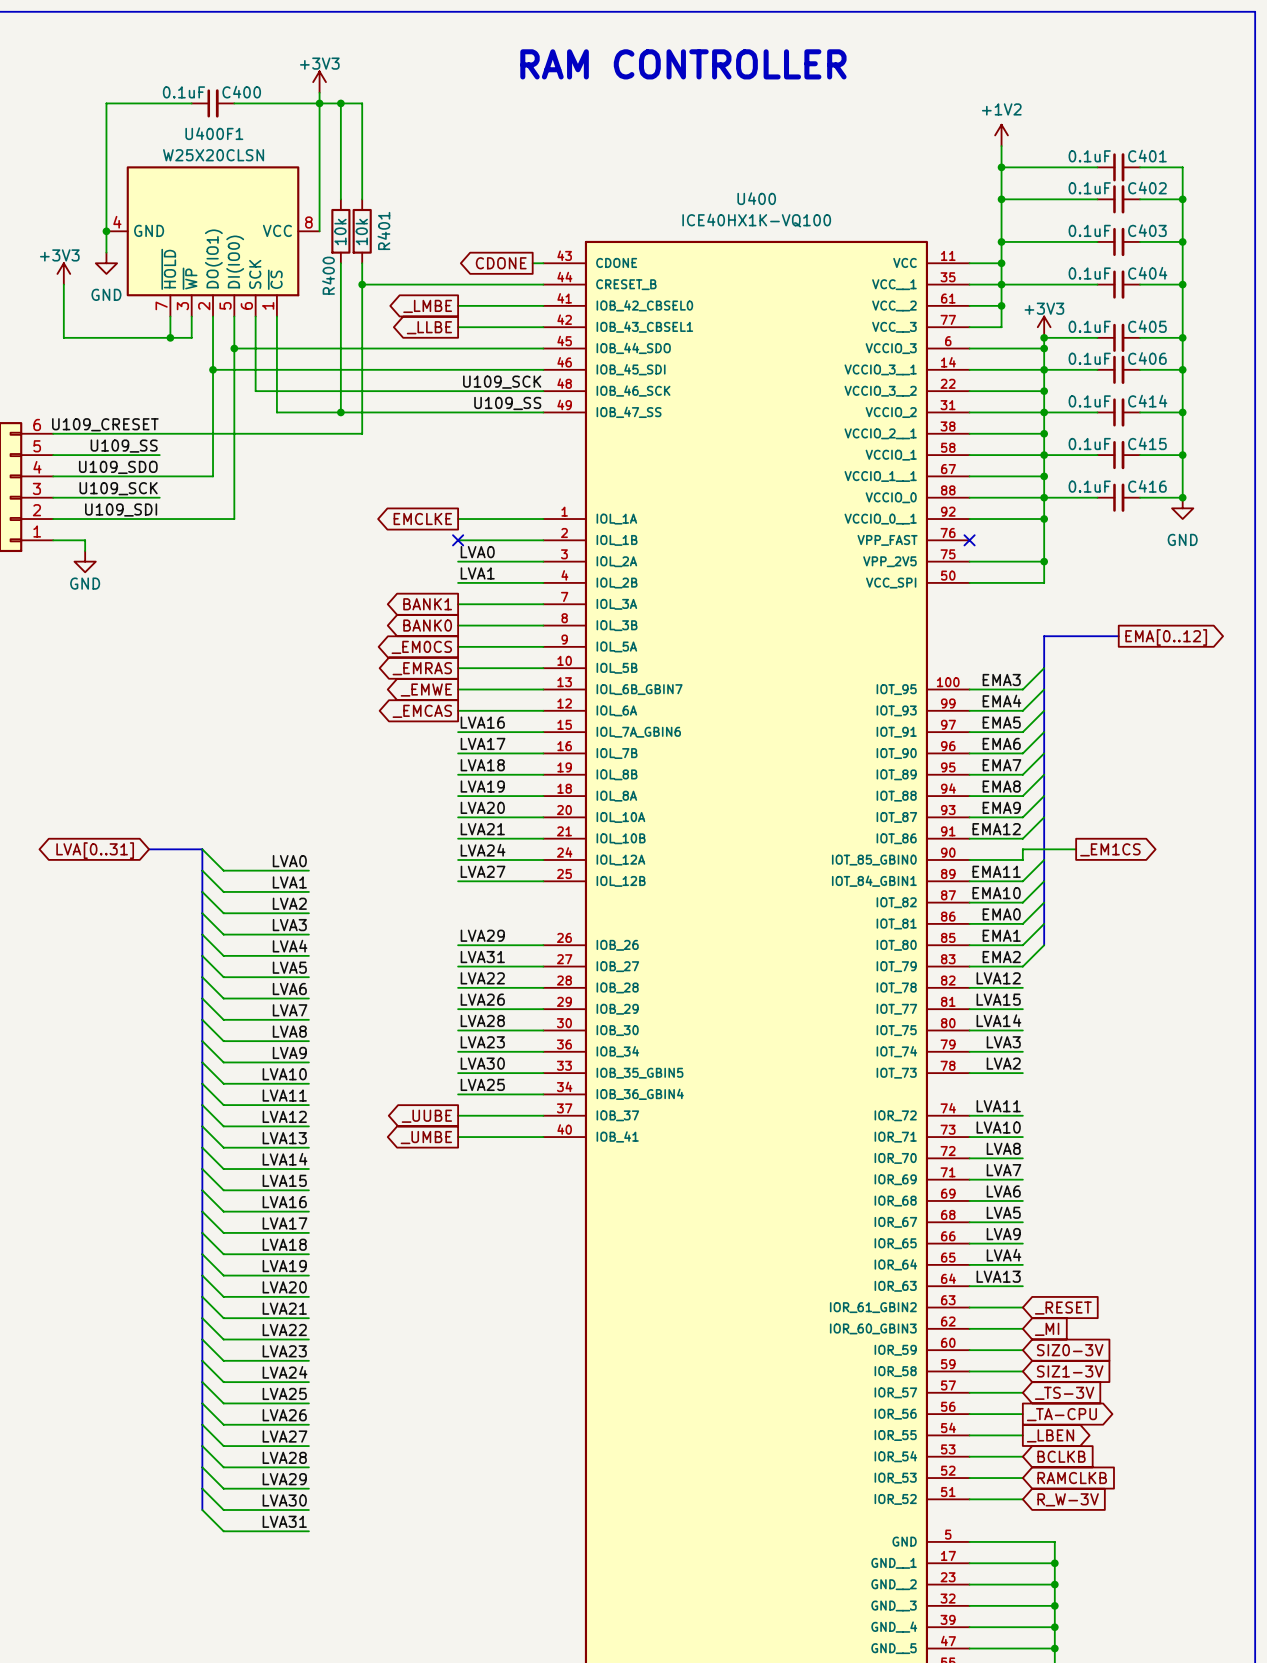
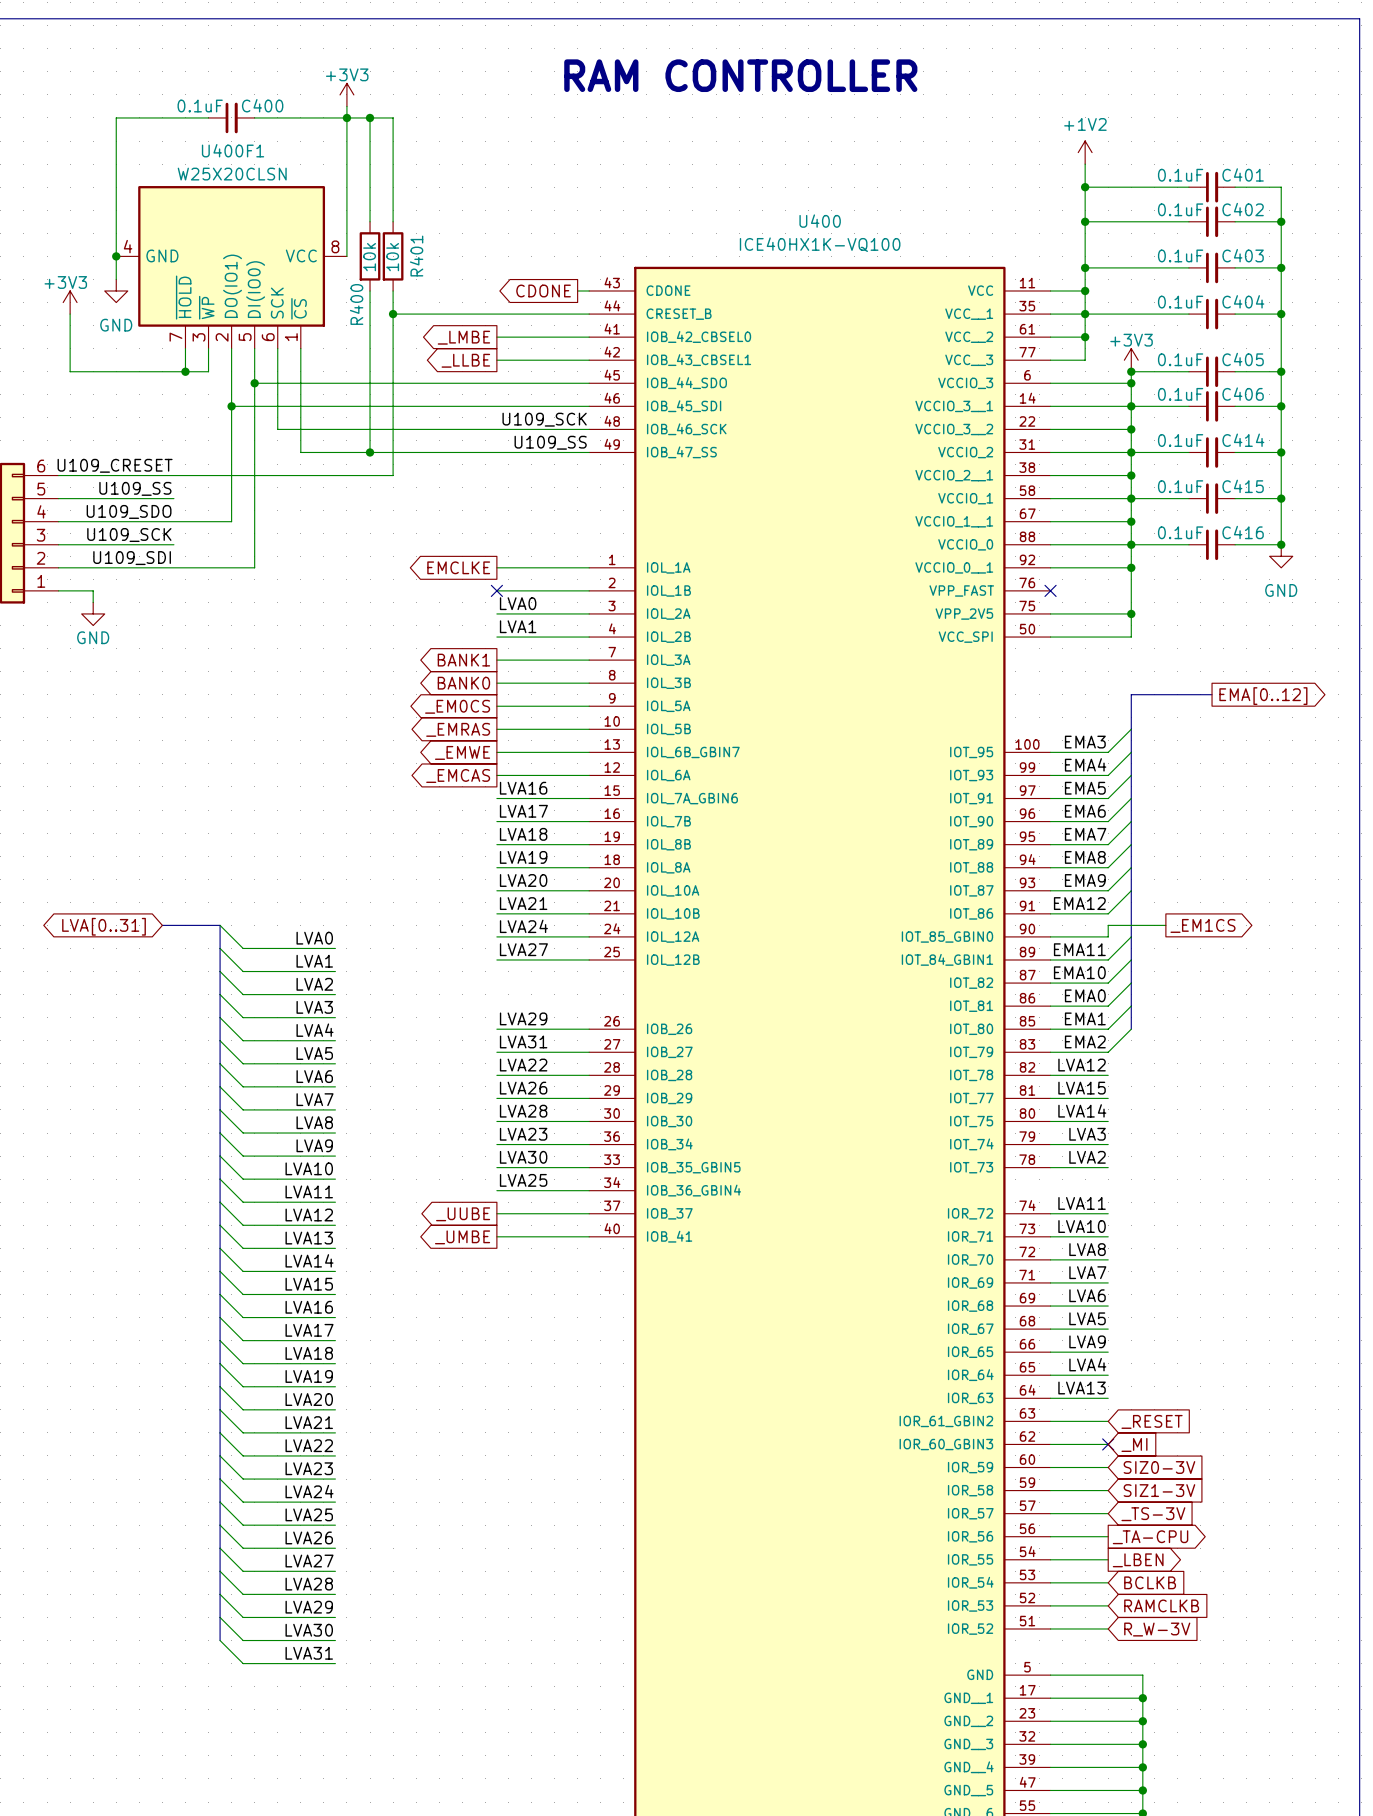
no-connect mark: none -> (1108, 1444)

